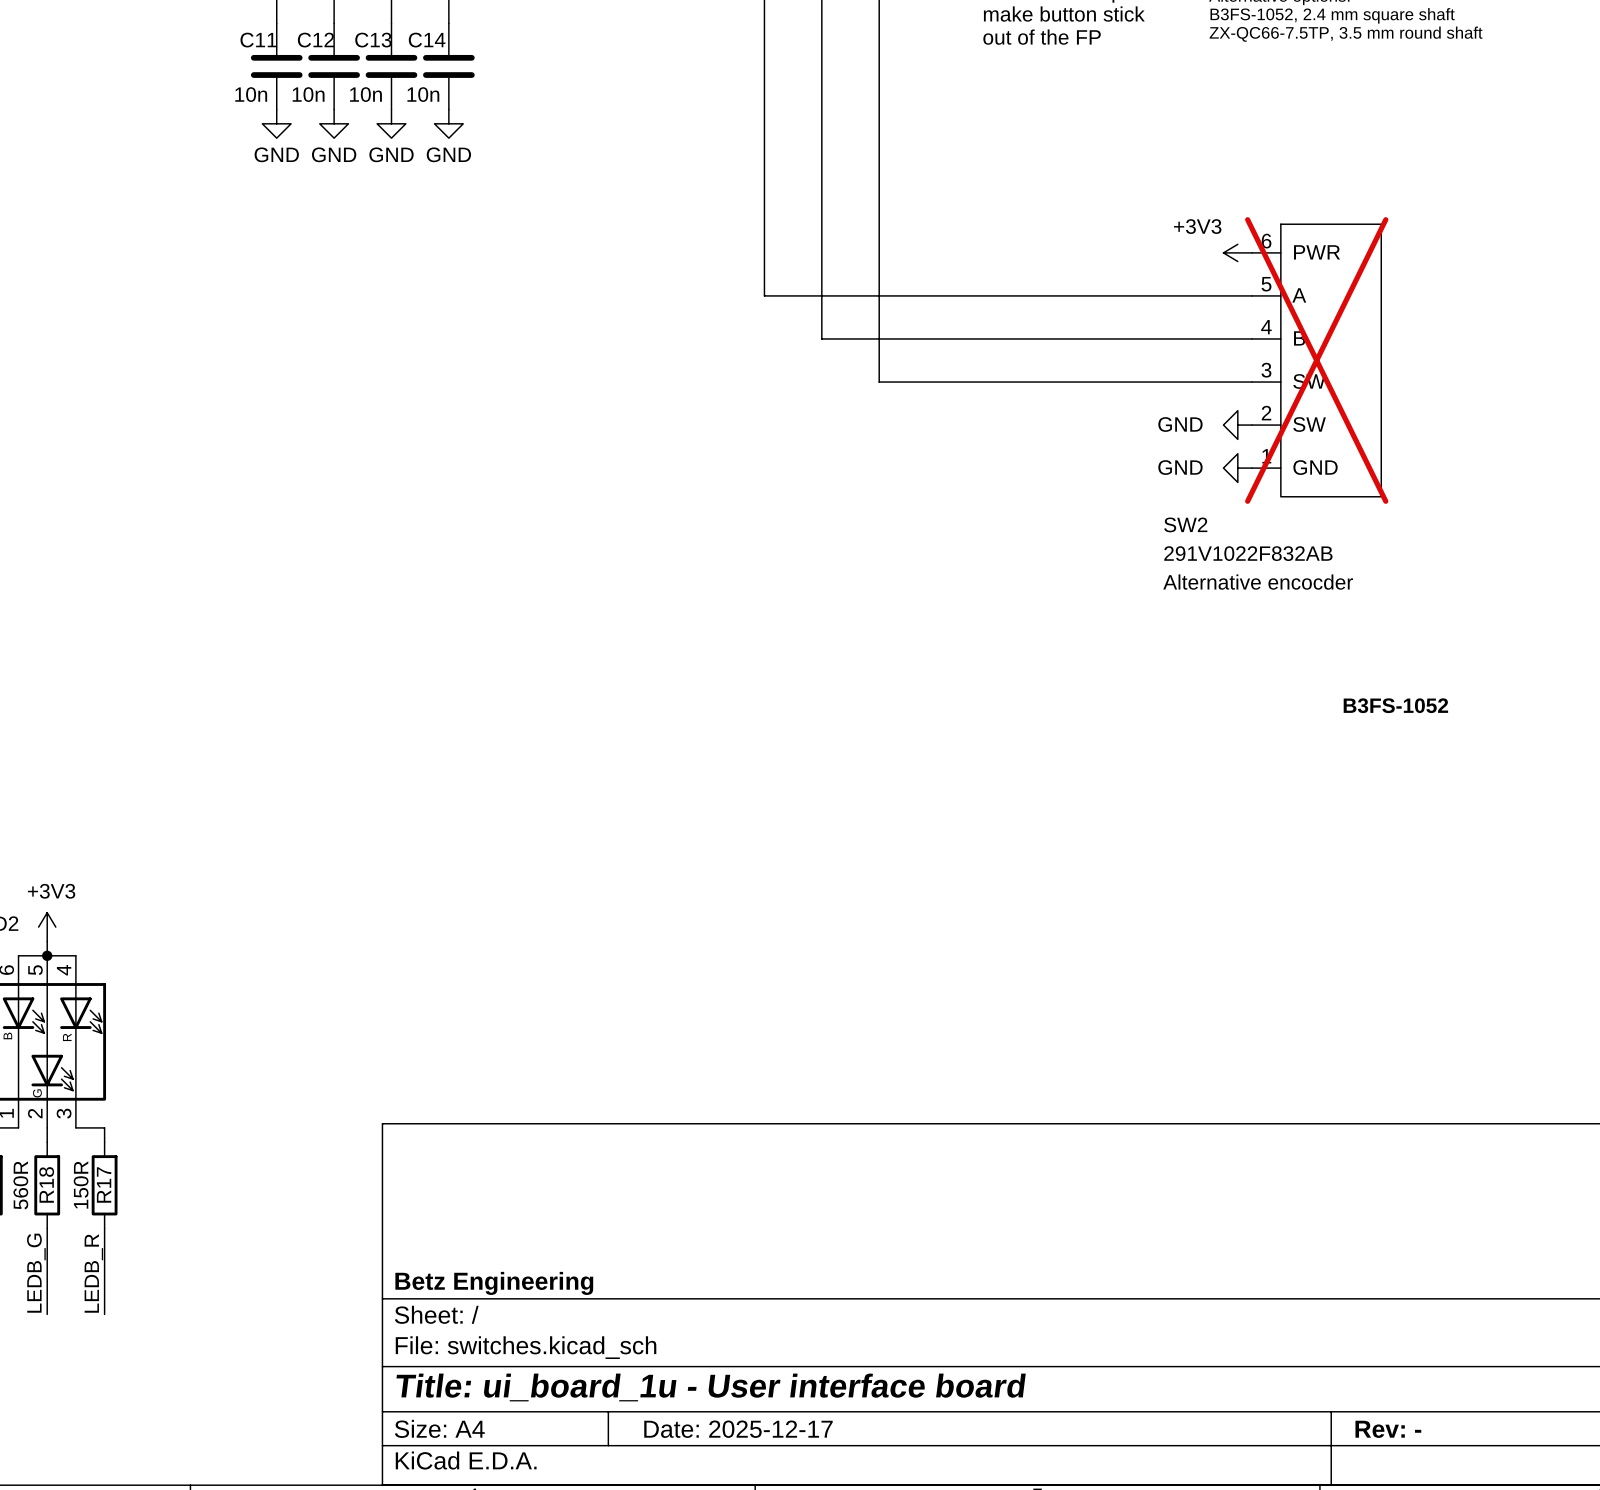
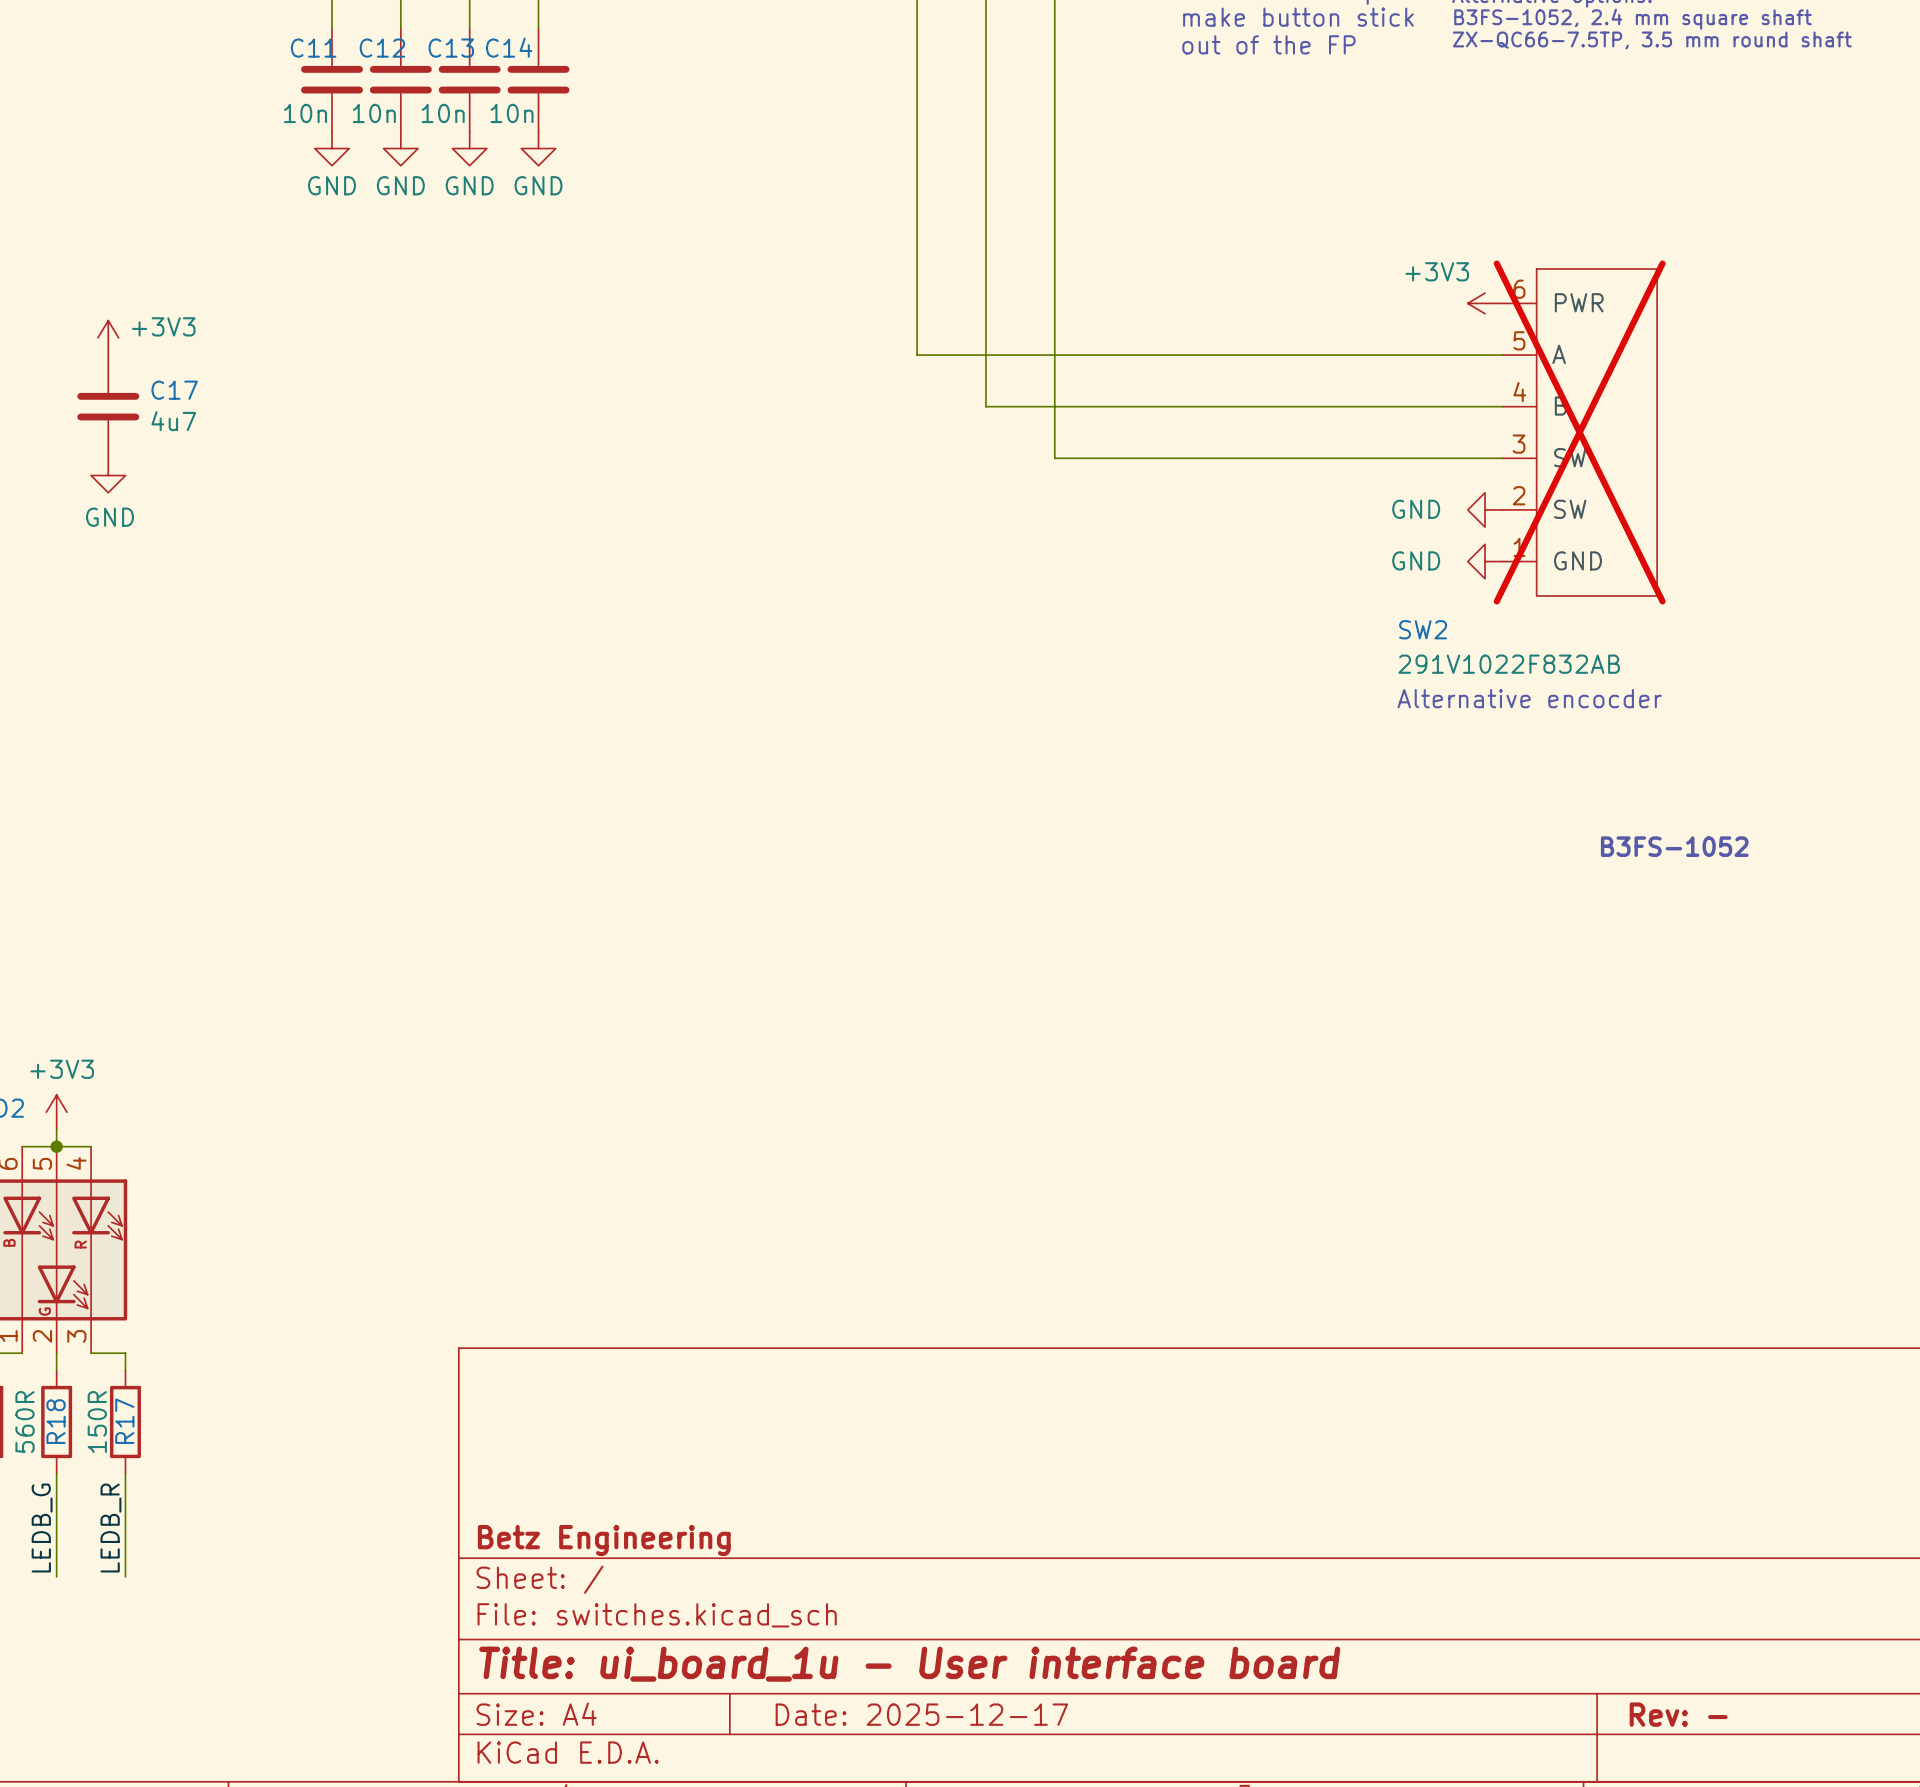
power symbol: none -> +3V3 (108, 337)
C17: none -> 4u7 (108, 406)
power symbol: none -> GND (108, 475)

